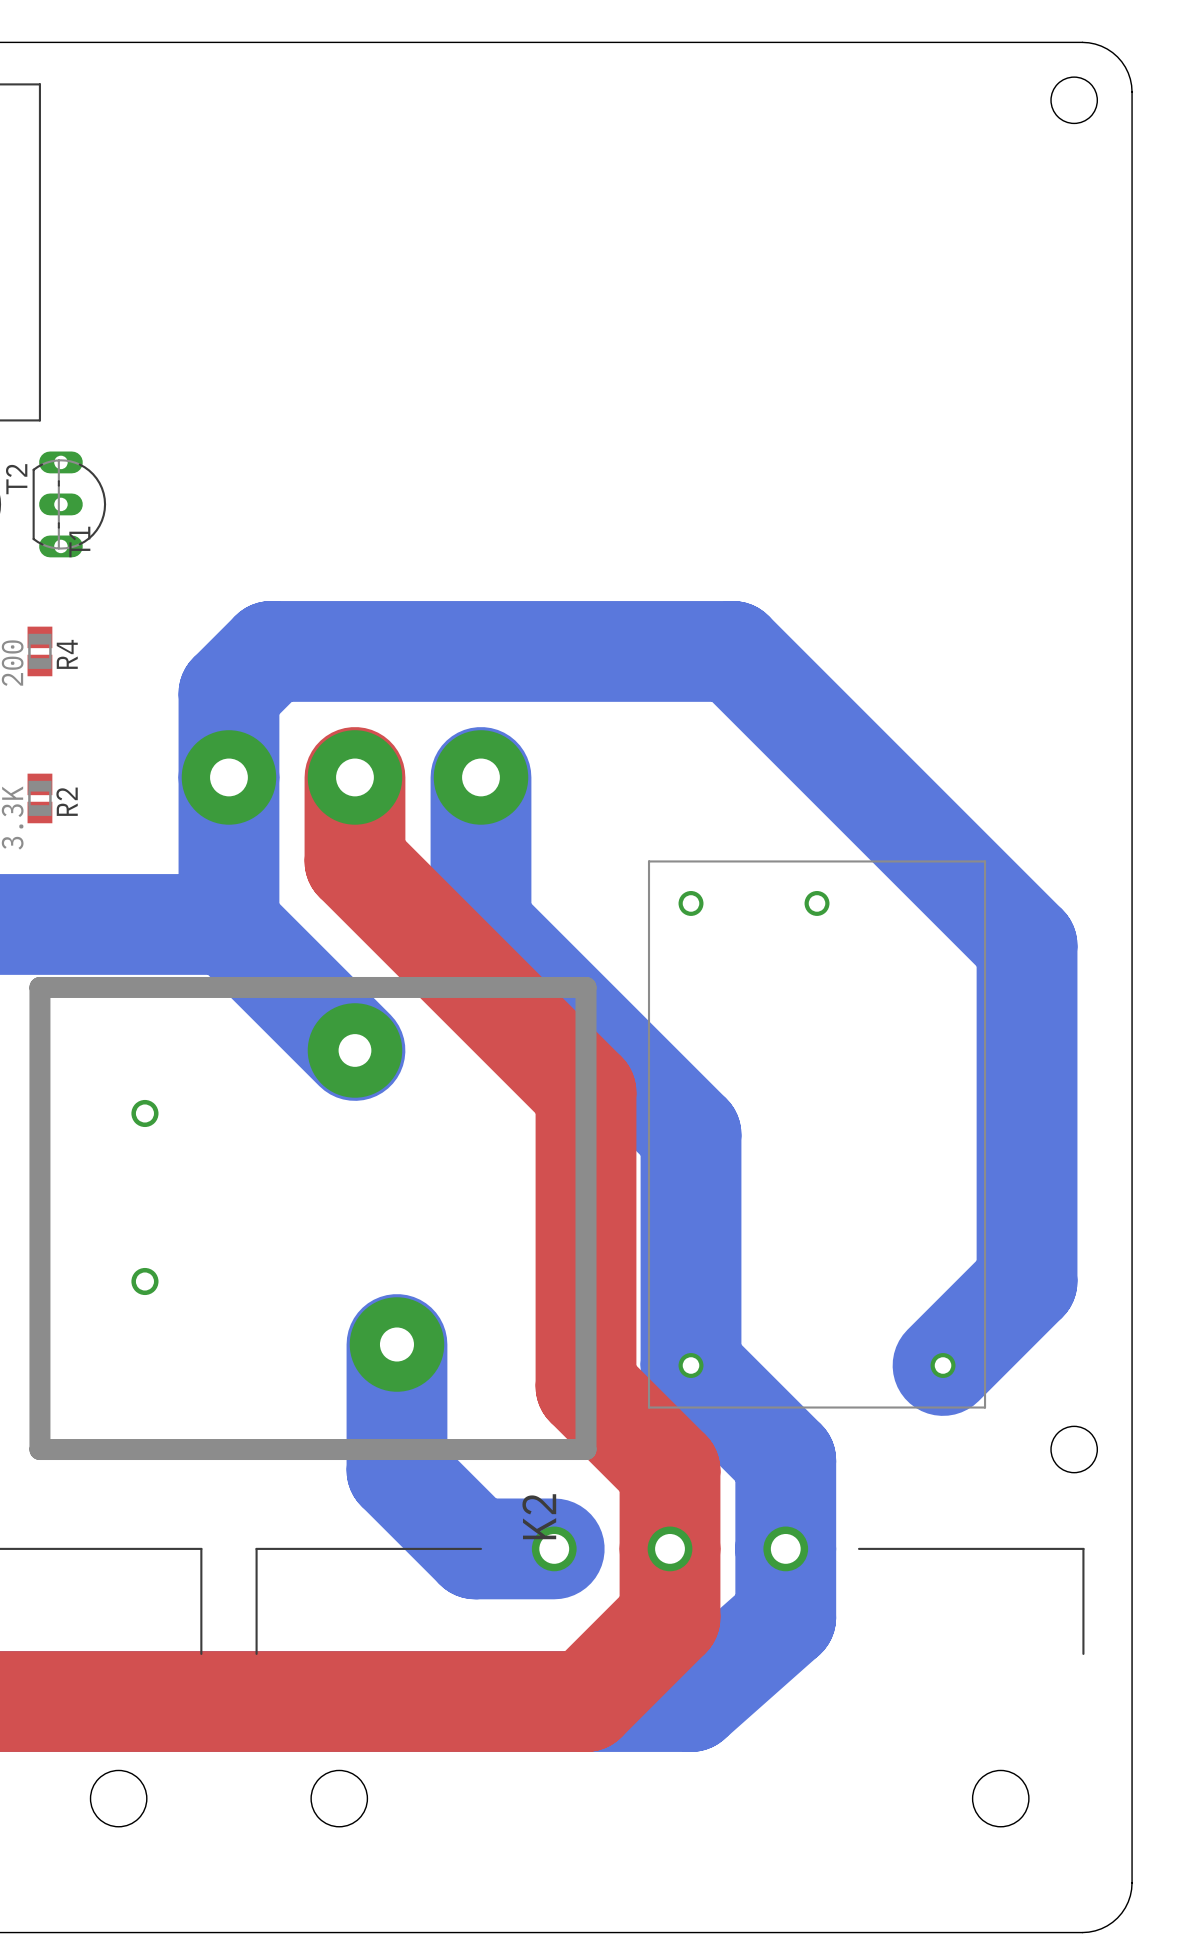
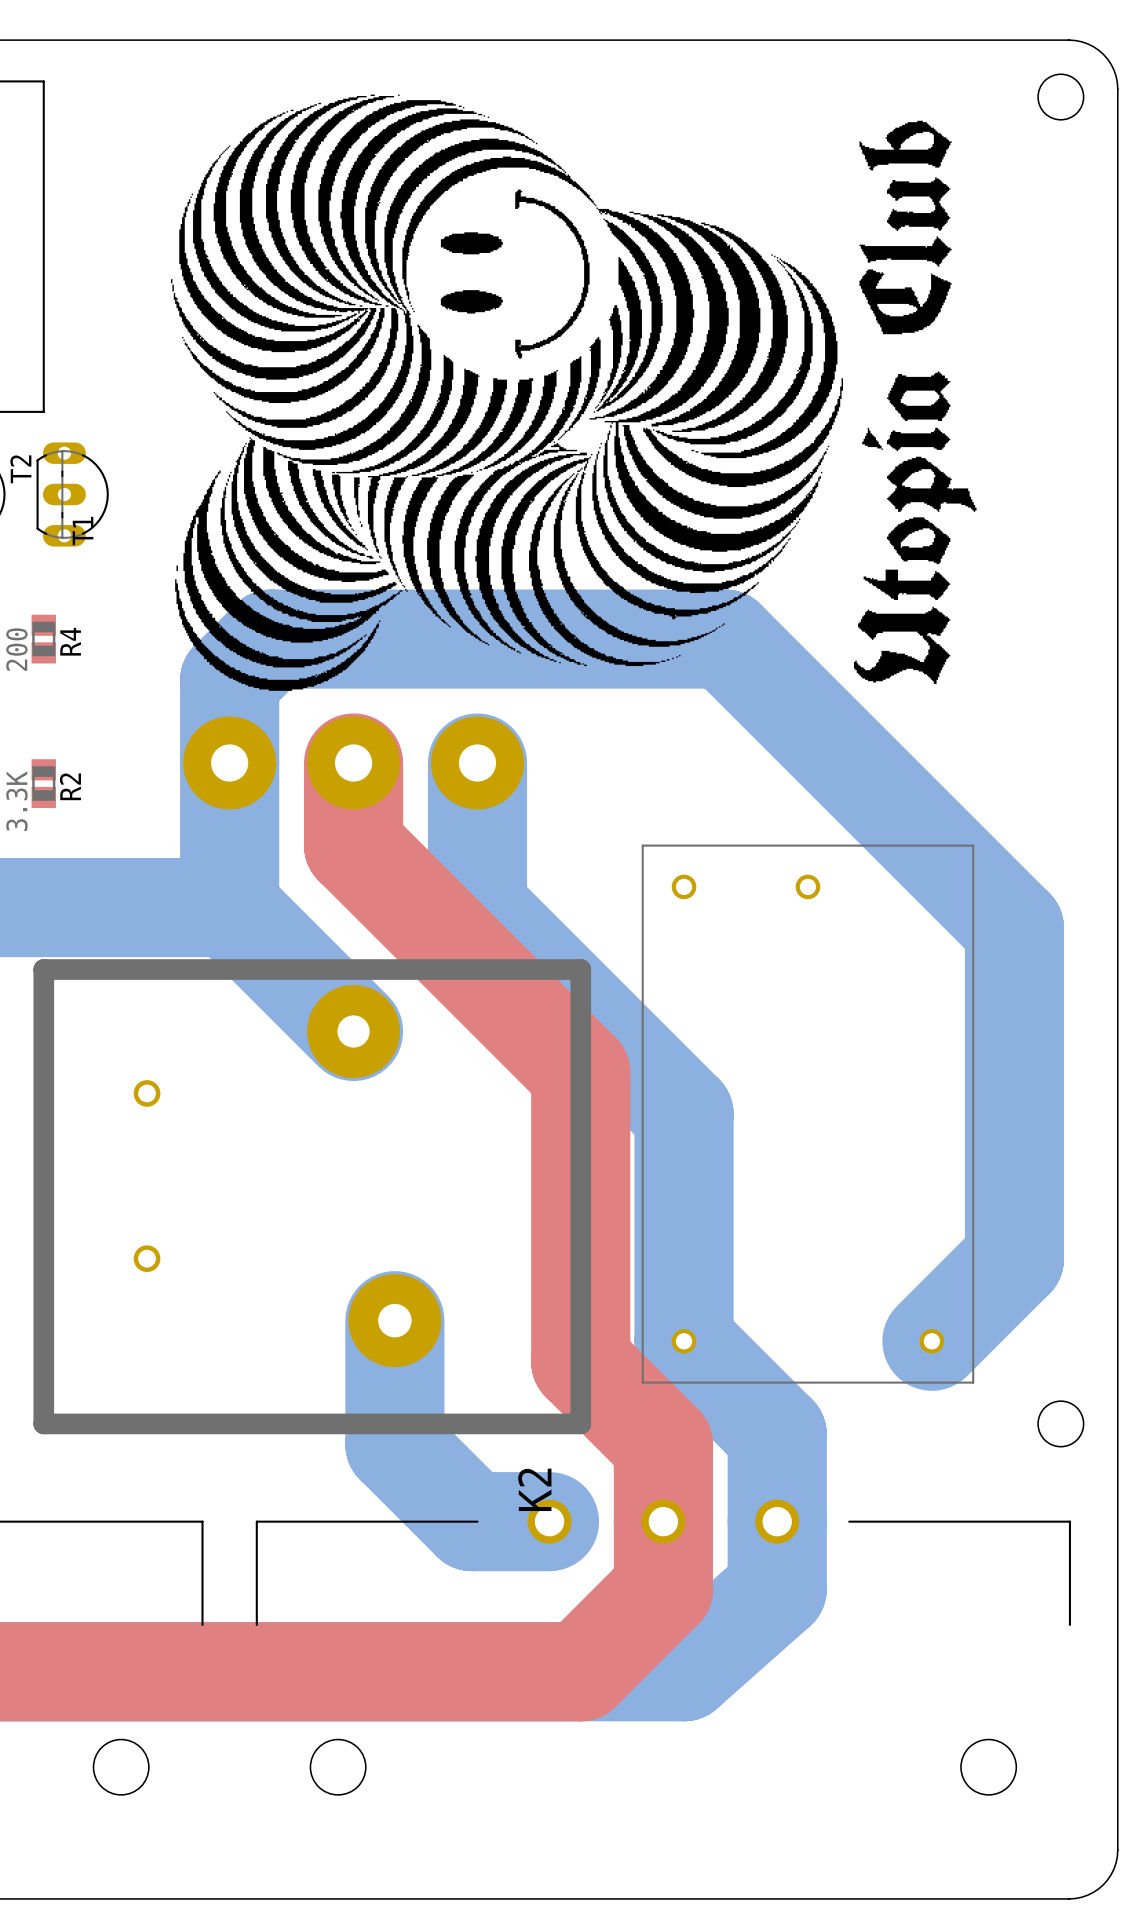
drawing: none -> [171, 94, 843, 691]
drawing: none -> [859, 120, 952, 335]
drawing: none -> [515, 189, 590, 359]
drawing: none -> [440, 232, 503, 255]
drawing: none -> [440, 290, 503, 314]
drawing: none -> [853, 371, 977, 684]

